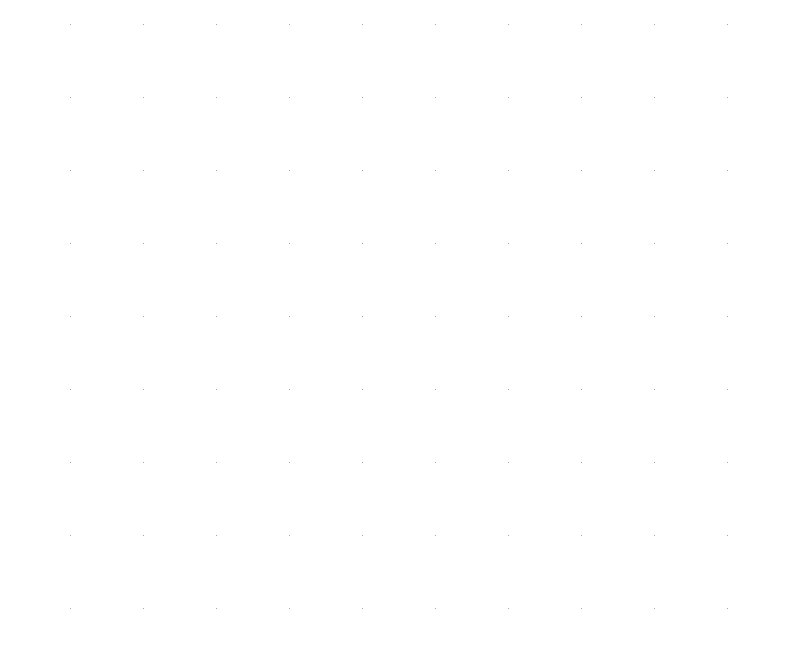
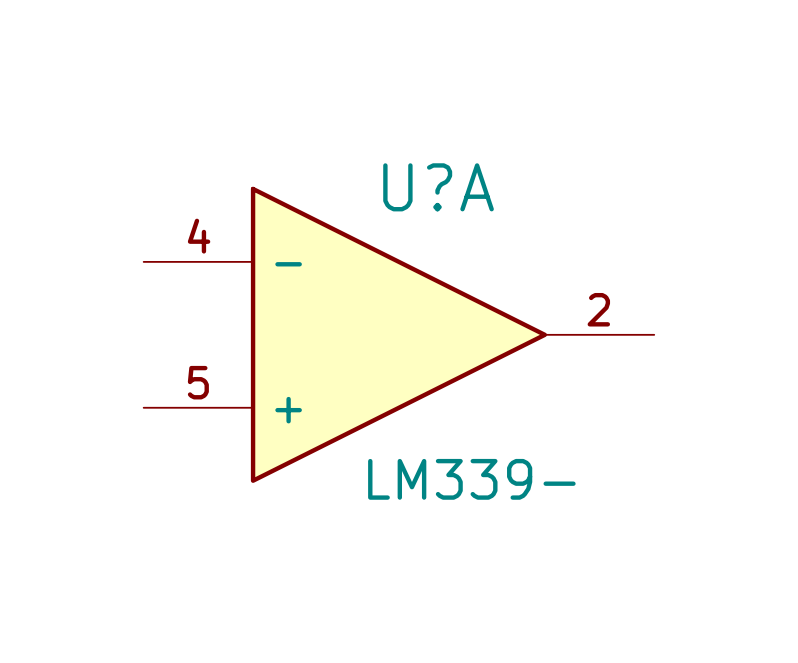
U?A: none -> LM339- (398, 334)

